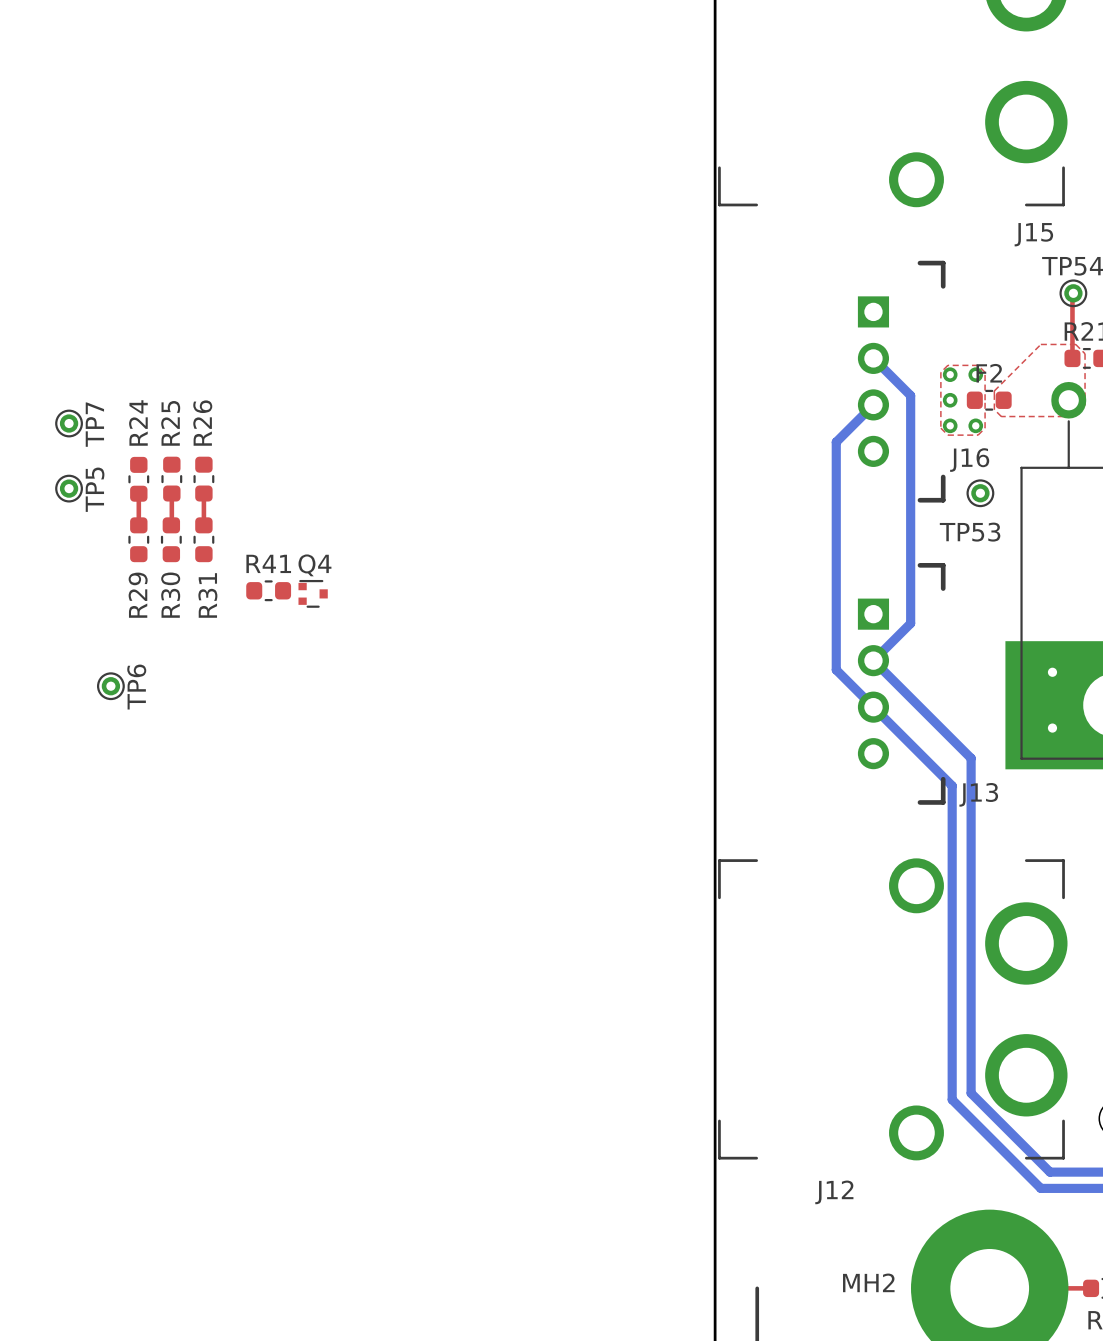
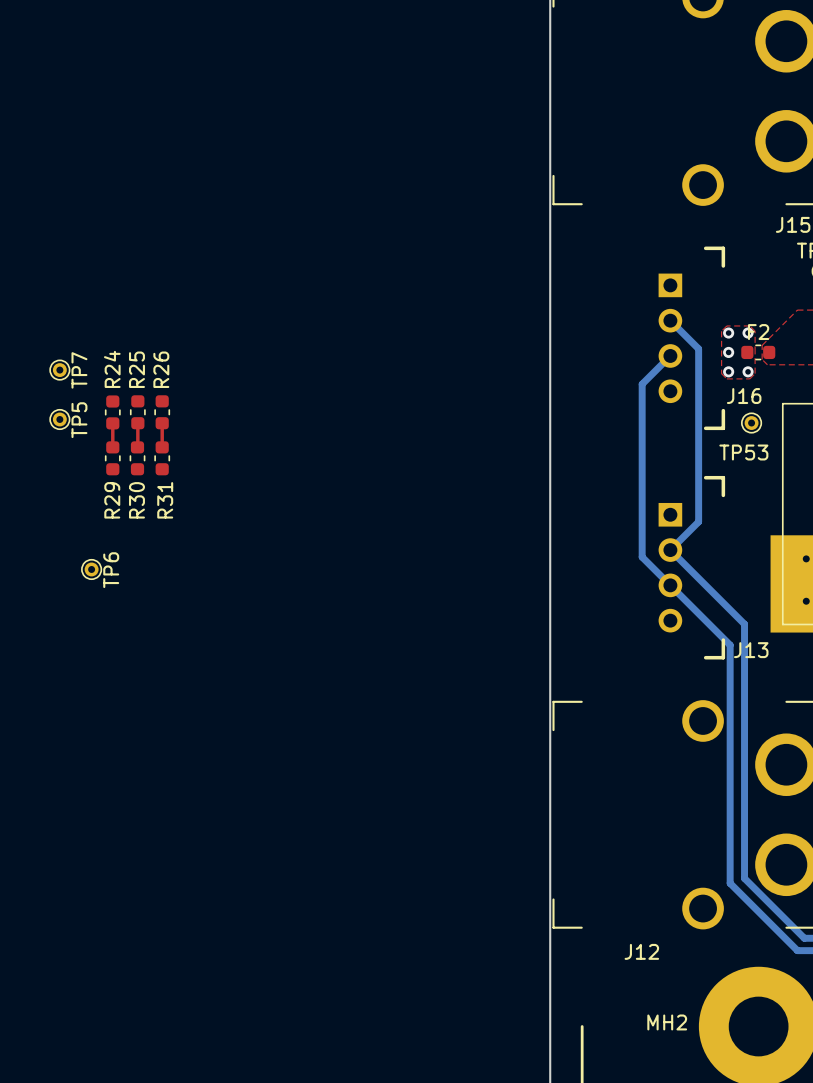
R41: (268, 590) -> none
Q4: (313, 593) -> none

